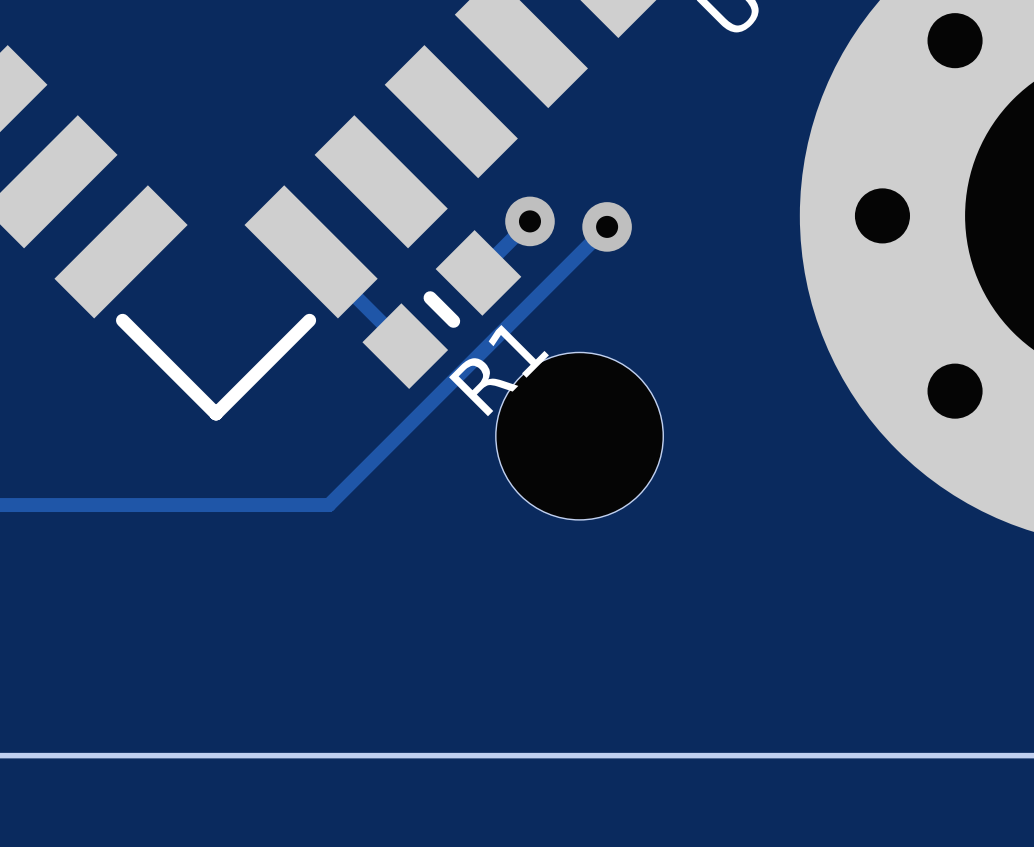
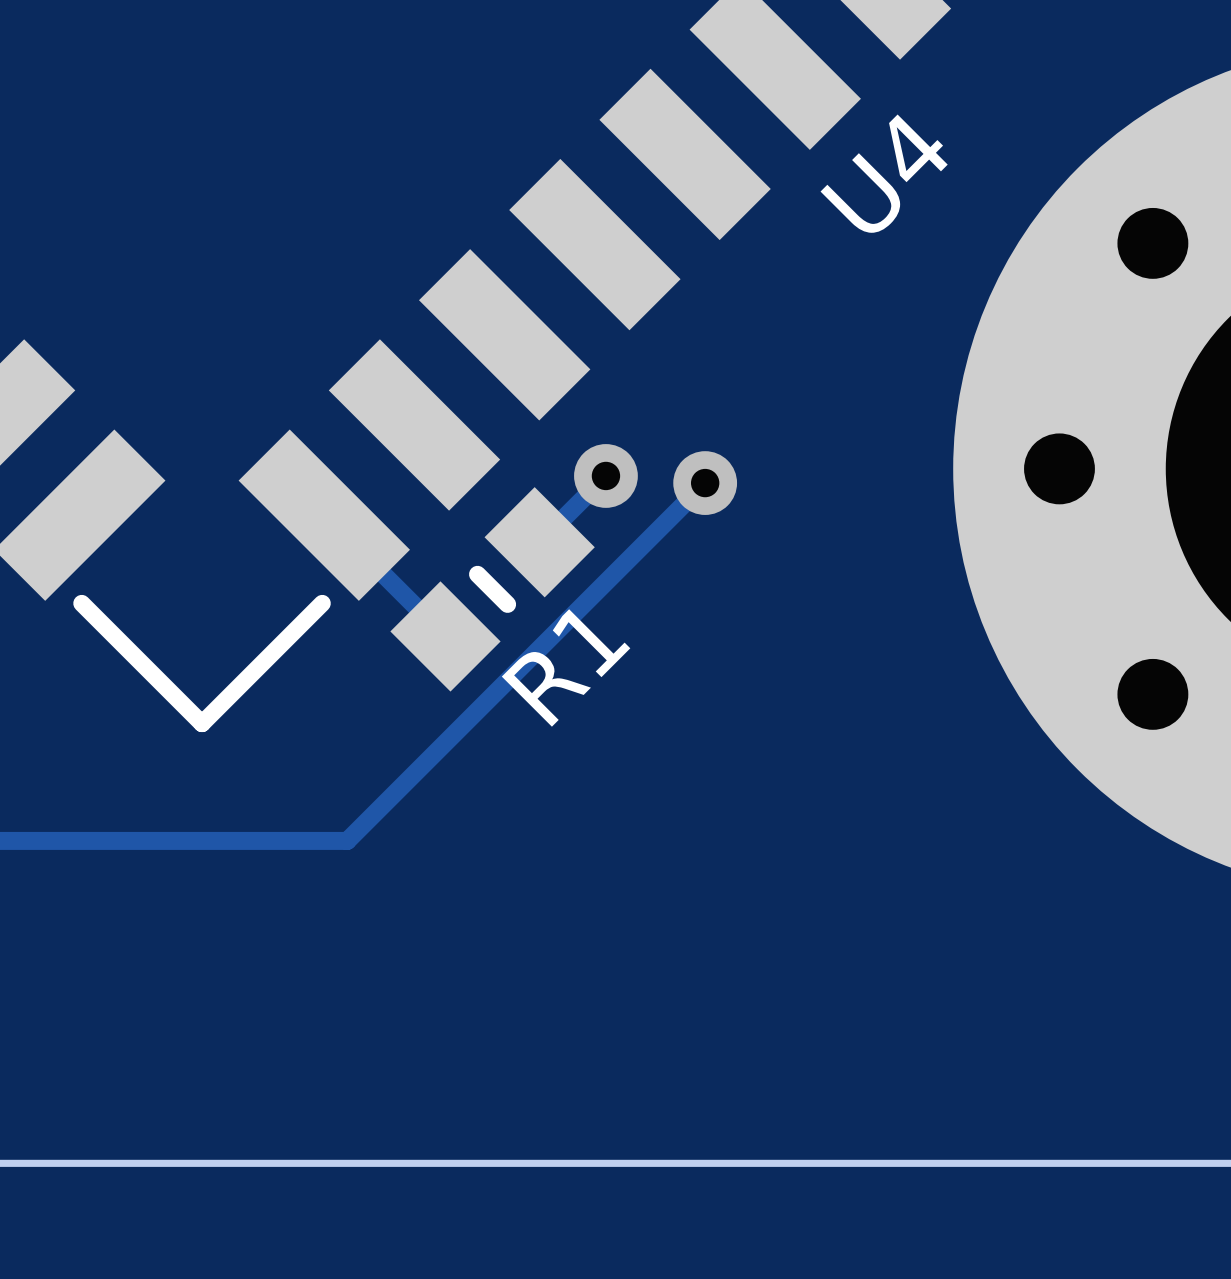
part: (579, 436) -> none

